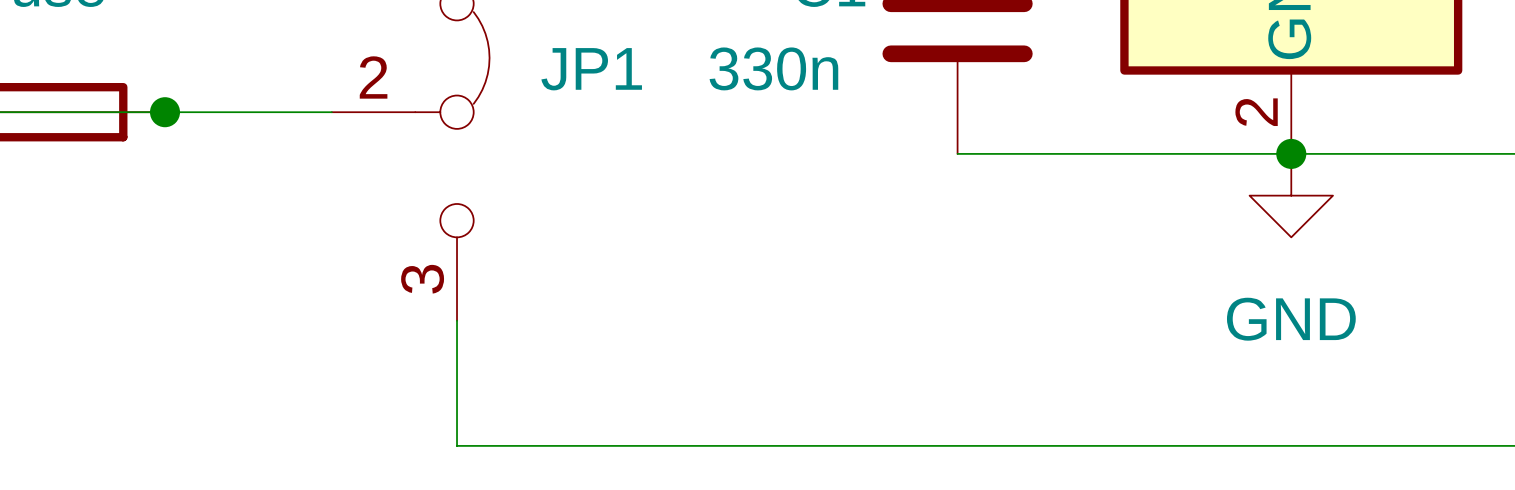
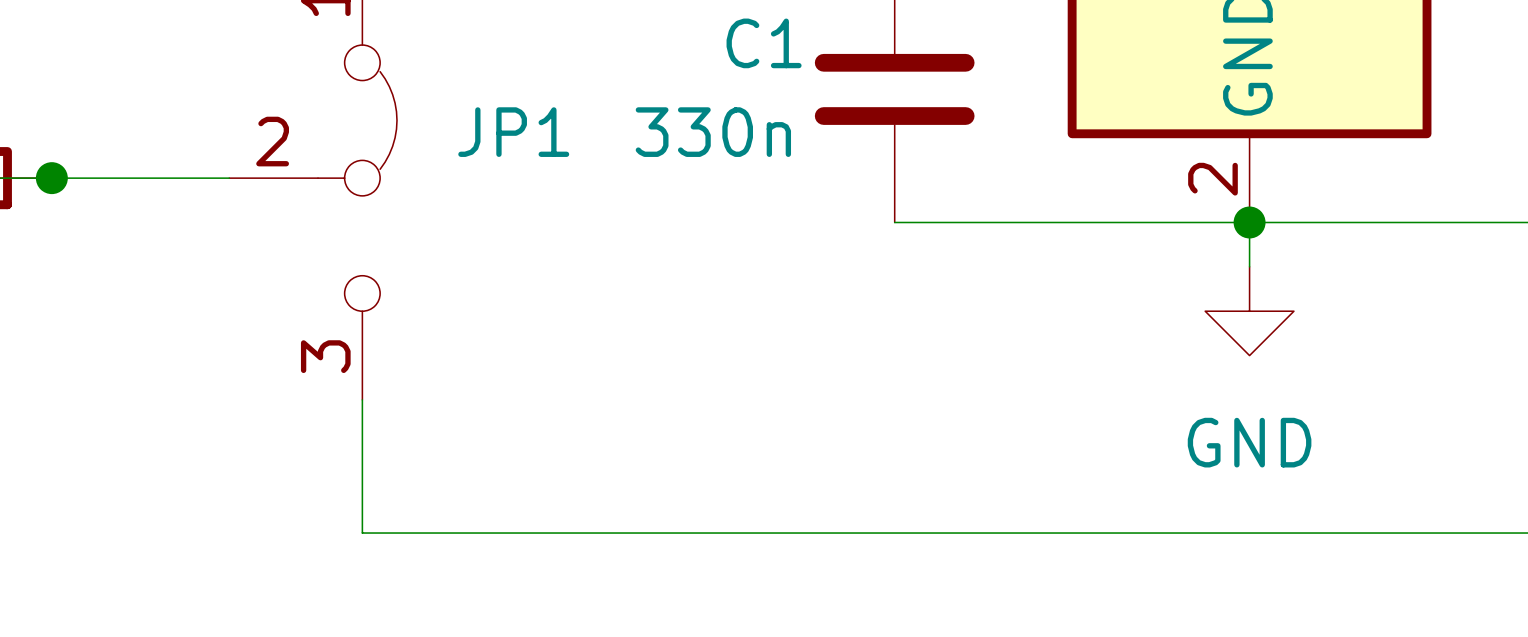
power symbol position: GND (1291, 195) -> GND (1249, 311)

